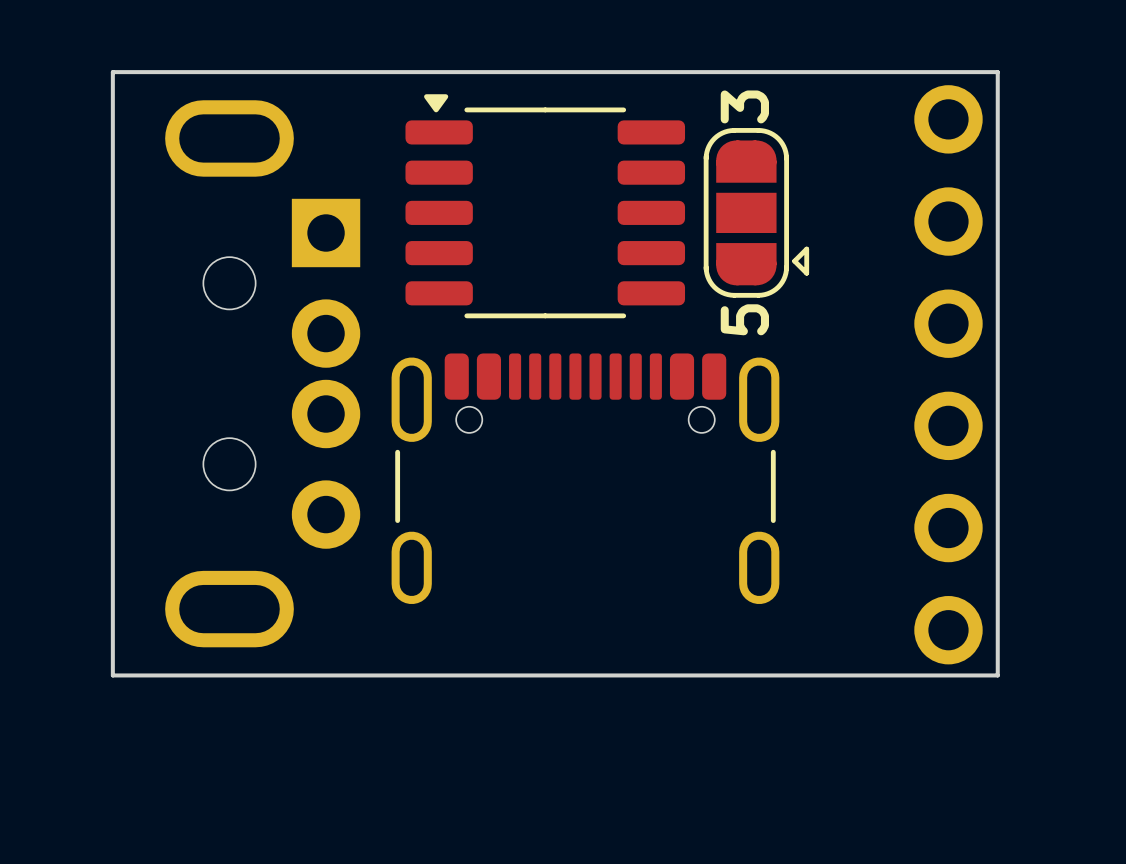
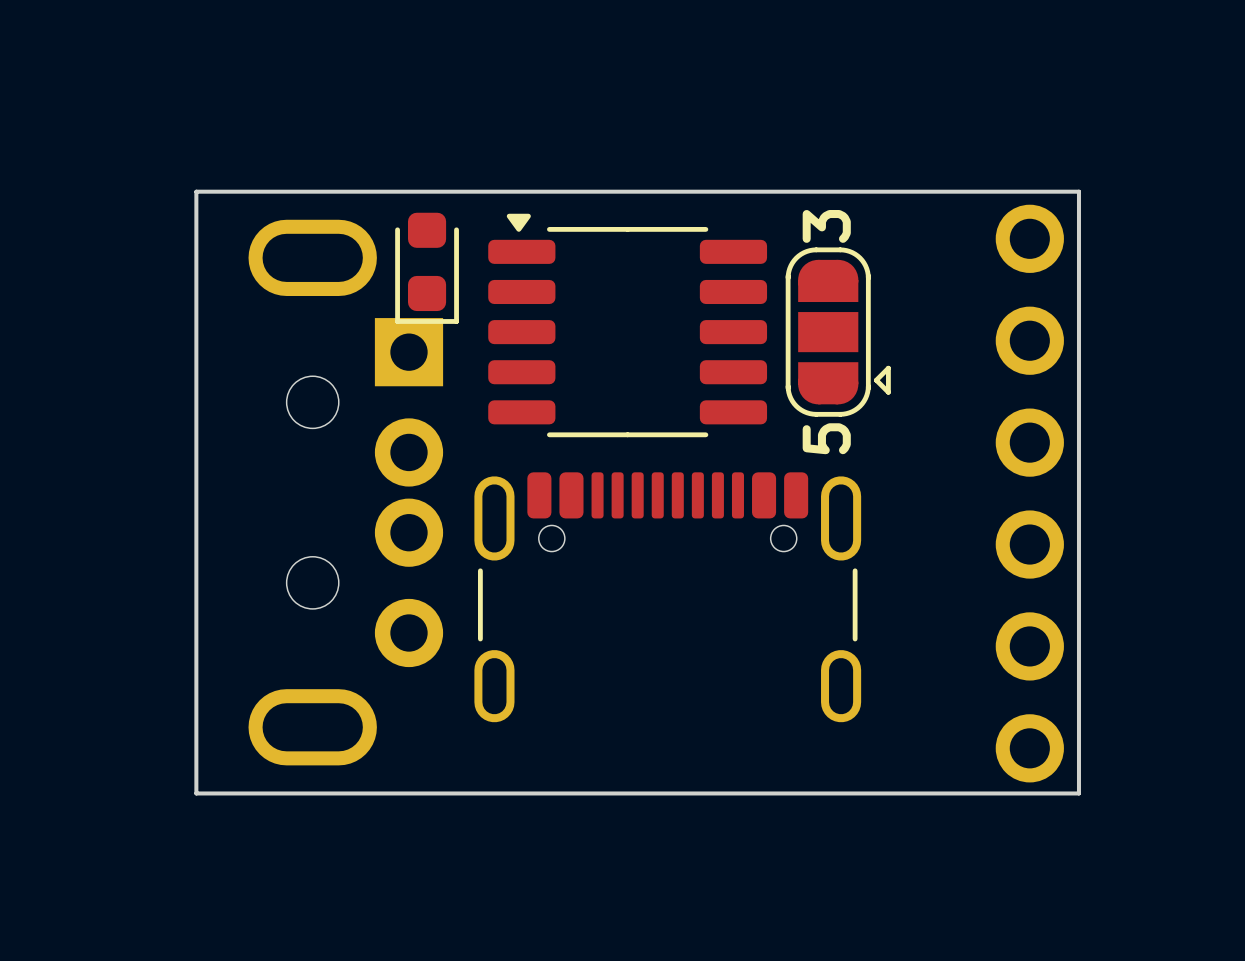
part: none -> (427, 268)

